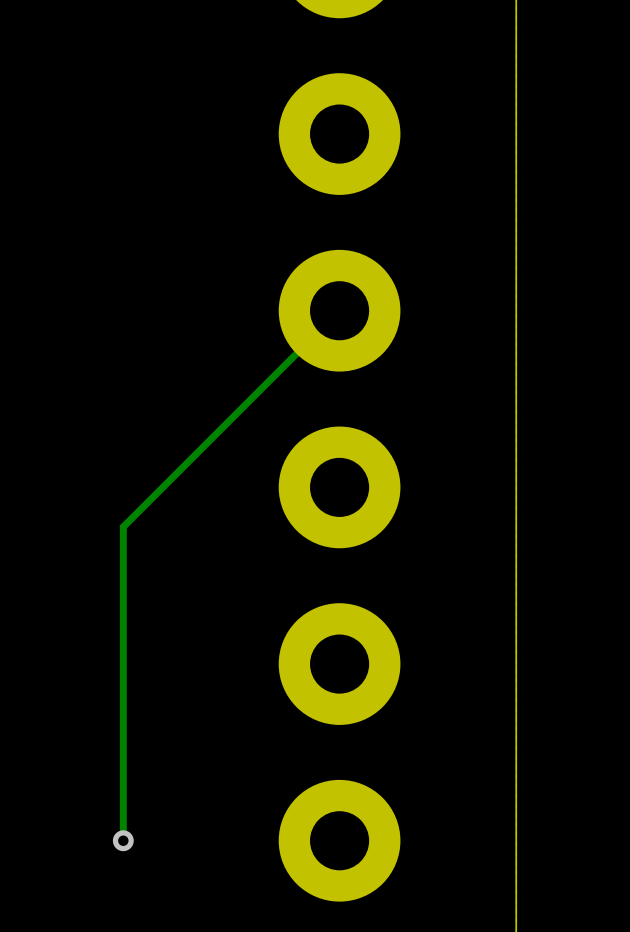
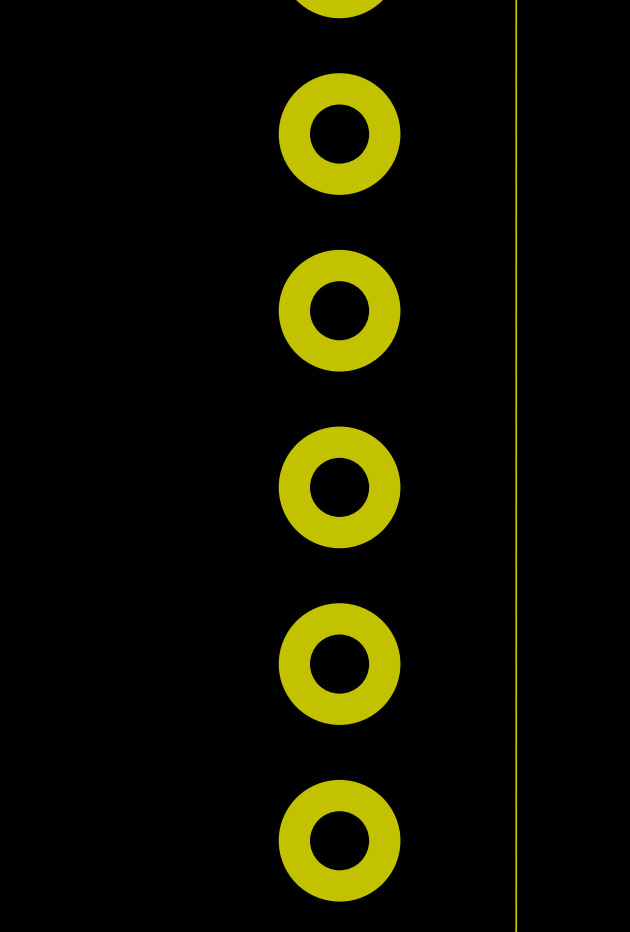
track: (339, 310) (123, 526) (123, 840) -> none
via: (123, 840) -> none

